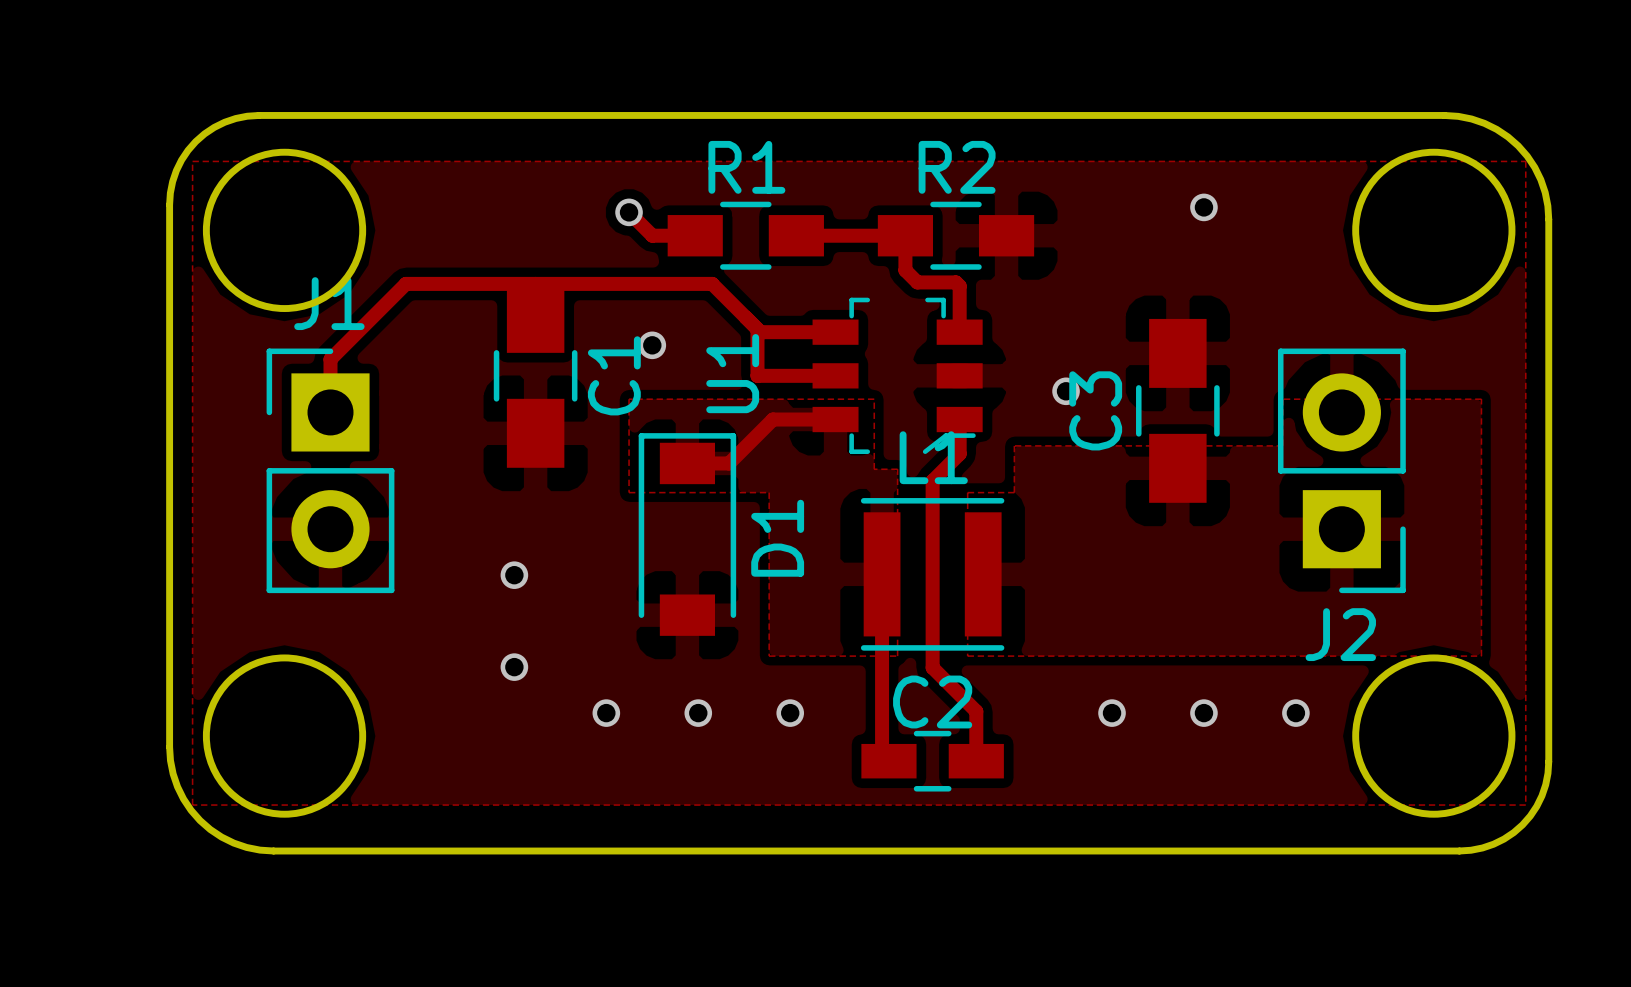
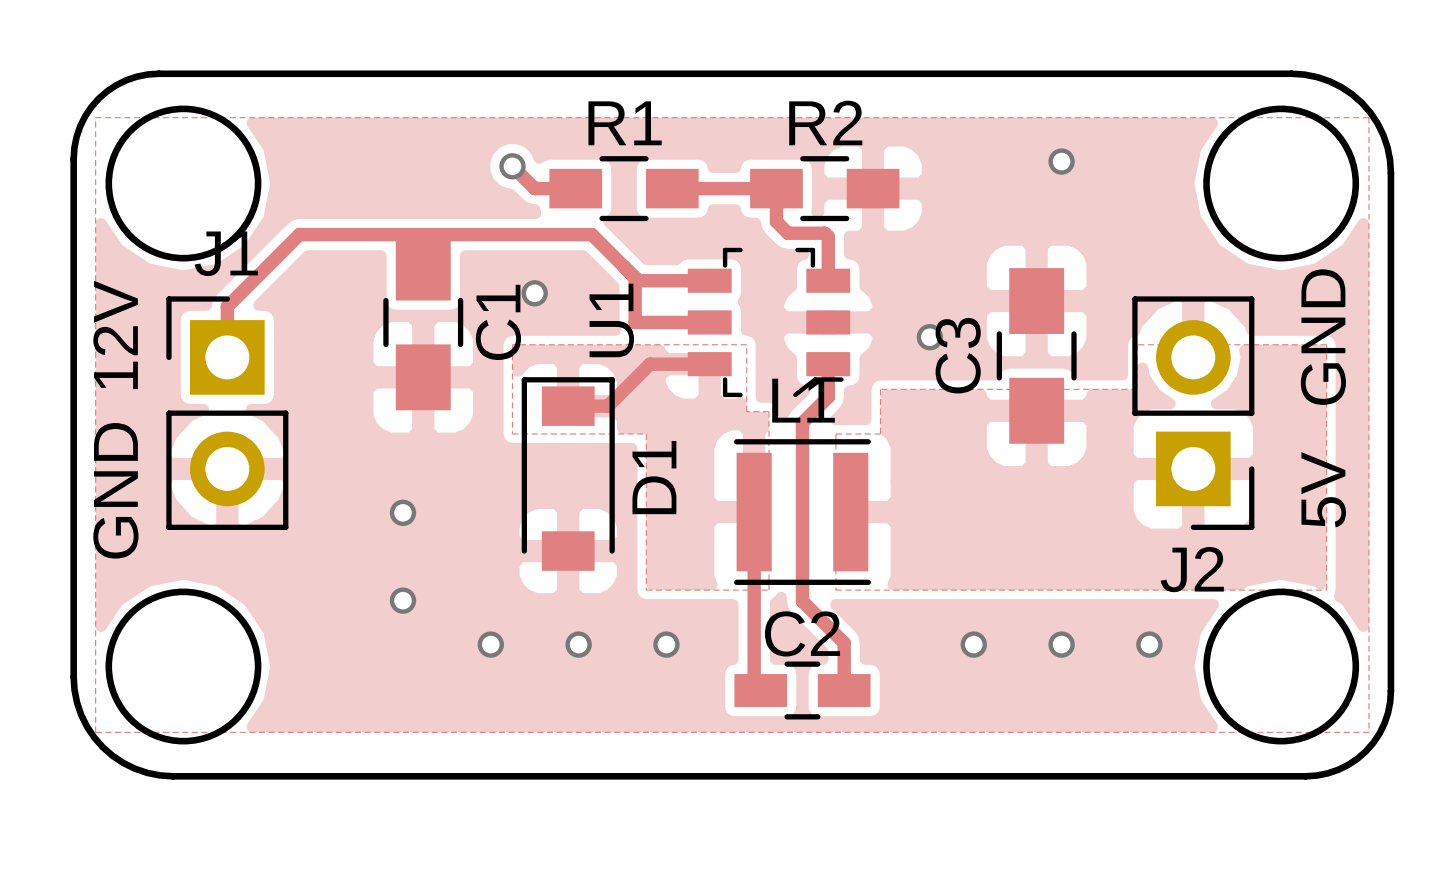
text: none -> 12V (115, 334)
text: none -> GND (1323, 337)
text: none -> 5V (1323, 489)
text: none -> GND (115, 490)

